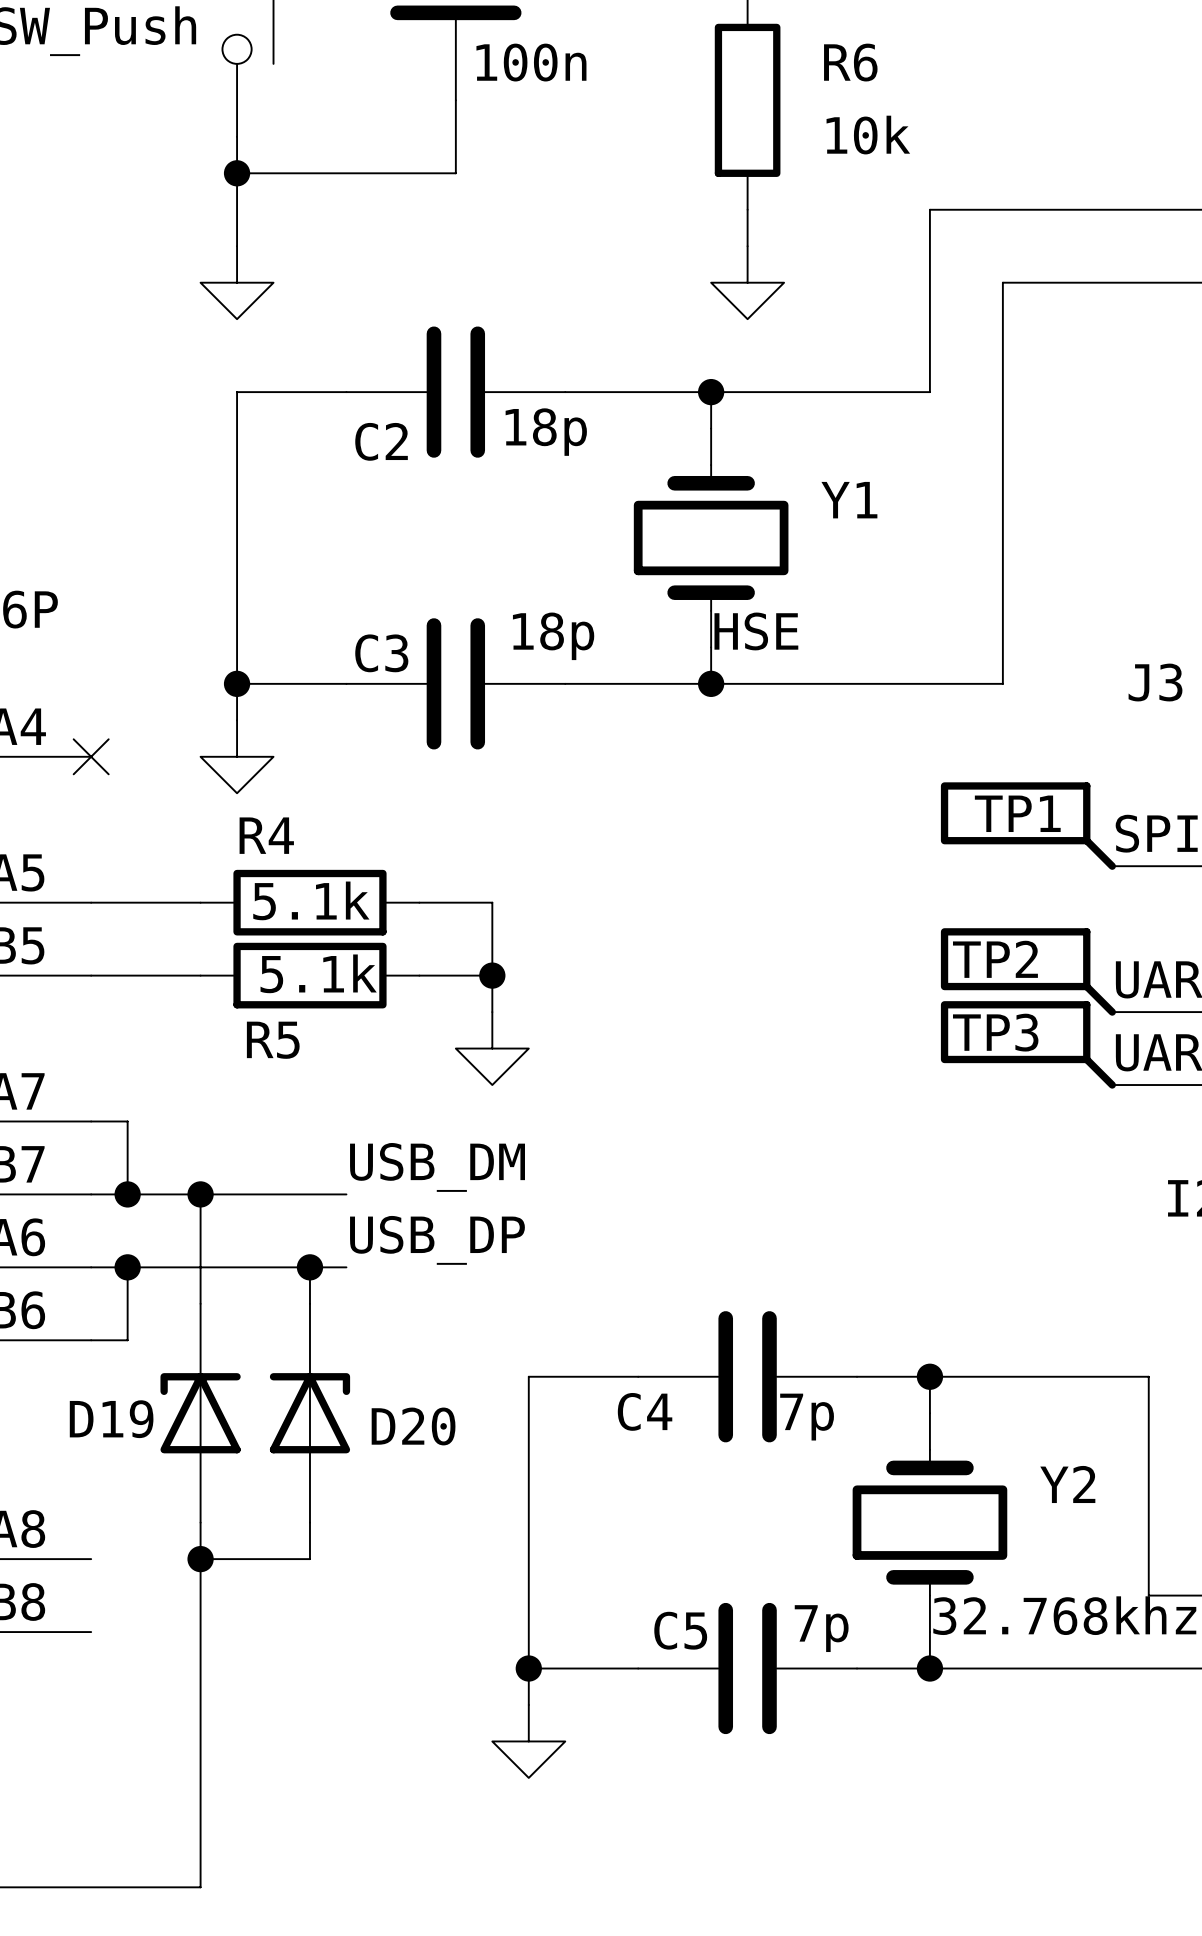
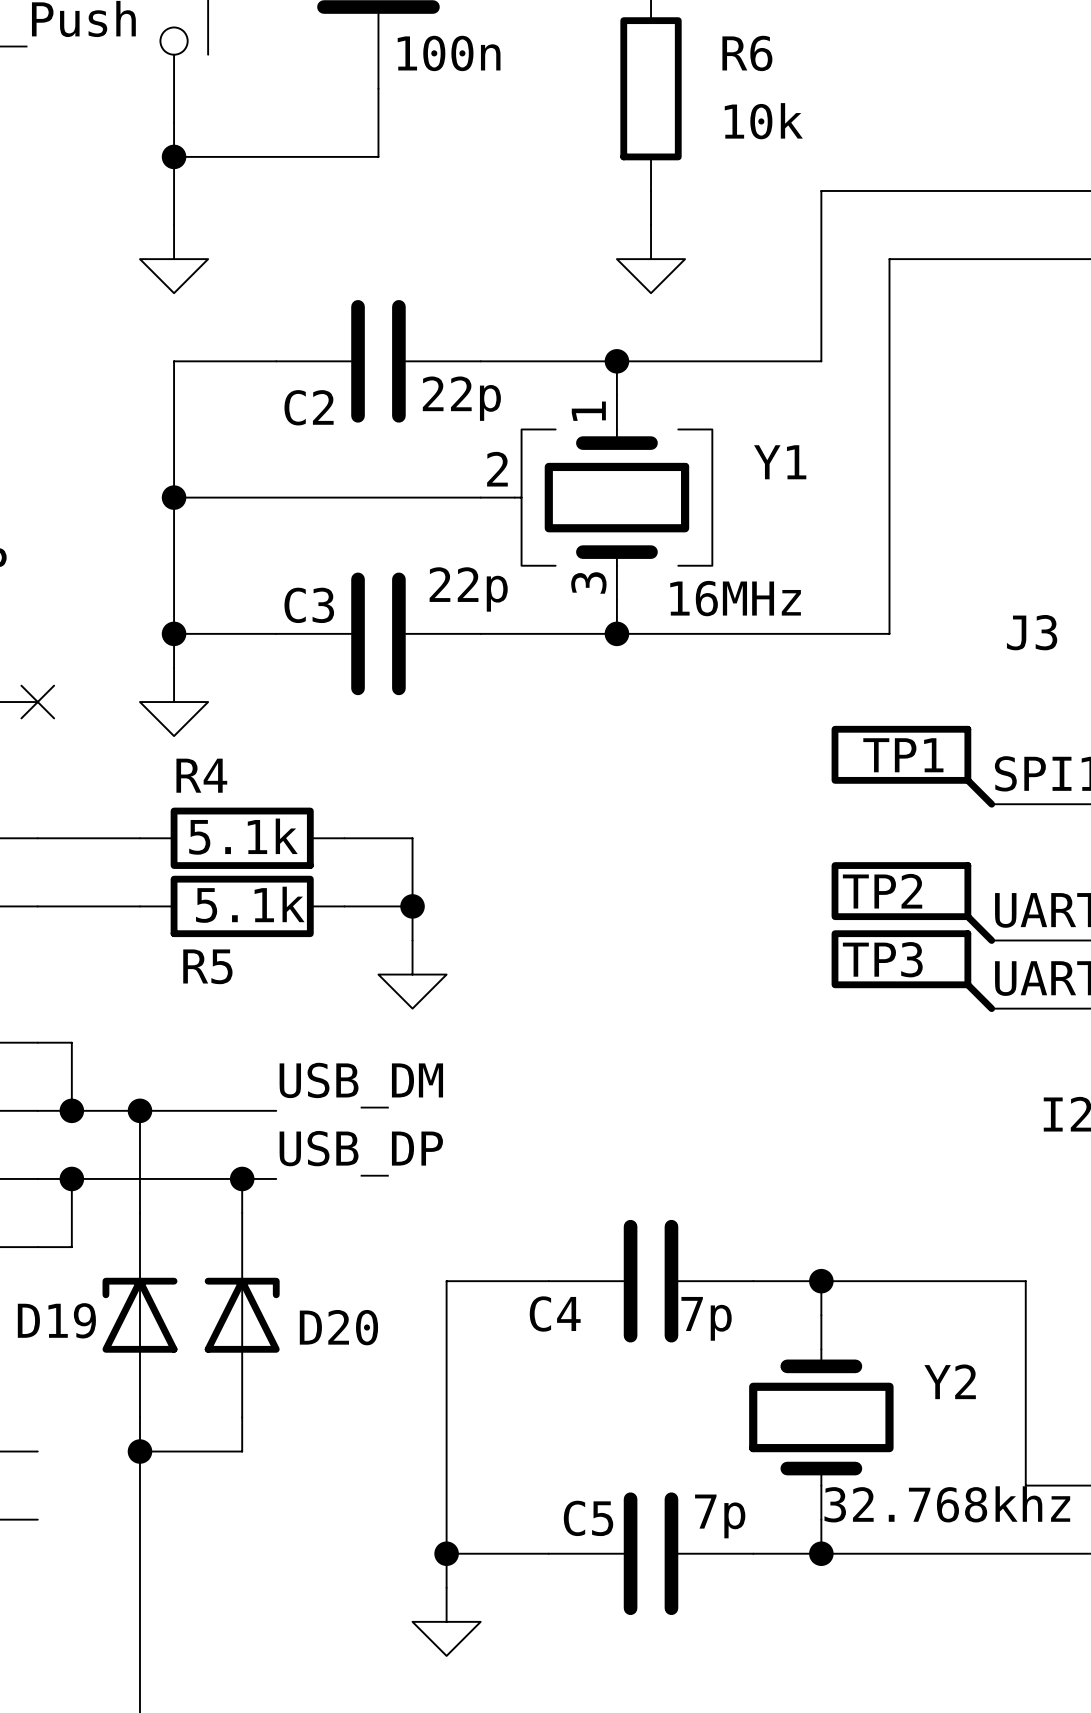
Y1 symbol: [633, 428, 789, 648] -> [480, 395, 713, 600]
C2 value: 18p (546, 432) -> 22p (461, 398)
Y1 name position: Y1 (849, 500) -> Y1 (780, 462)
wire: none -> (174, 497) (480, 497)
junction: none -> (174, 497)
Y1 value: HSE (756, 631) -> 16MHz (735, 598)
C3 value: 18p (553, 636) -> 22p (468, 589)

